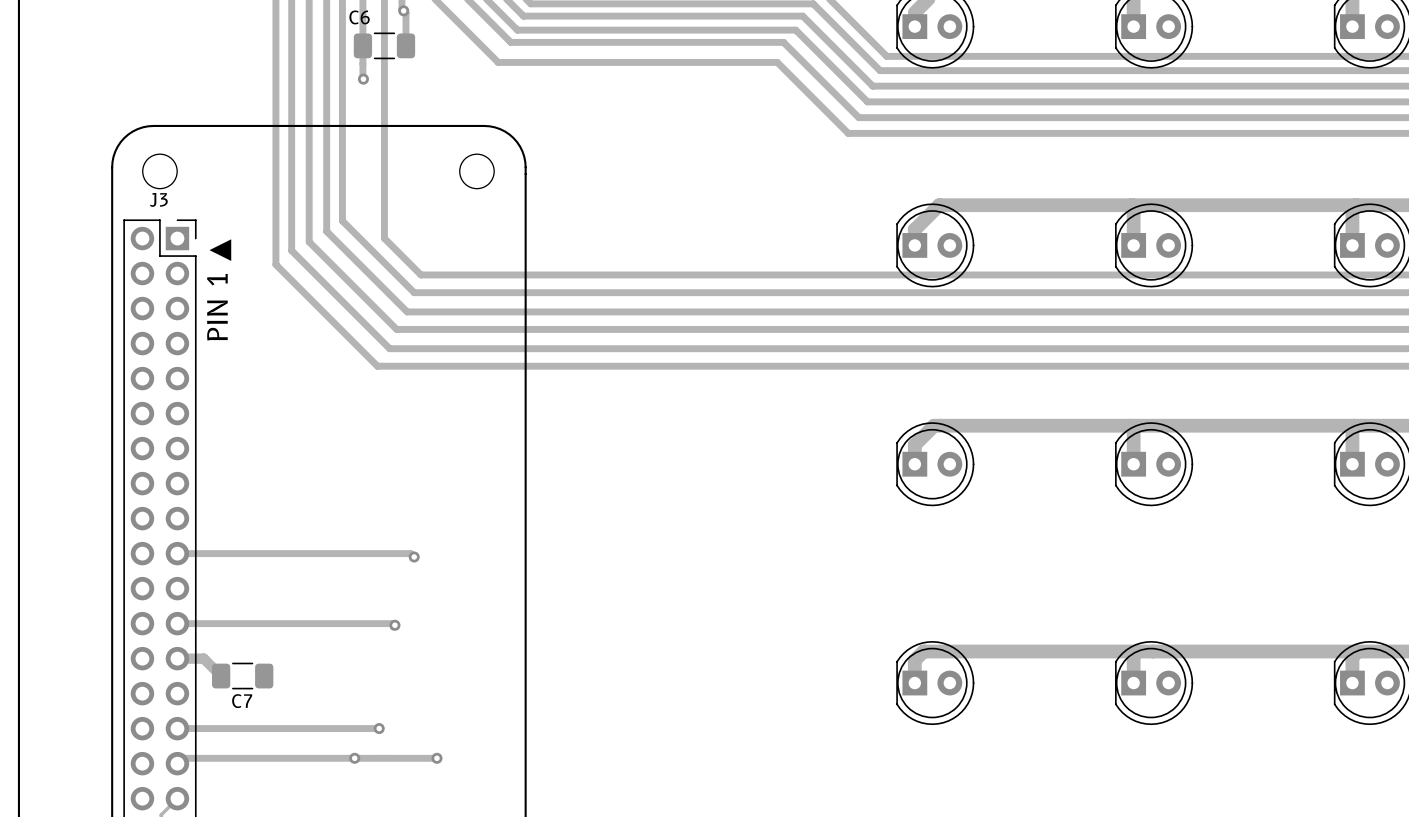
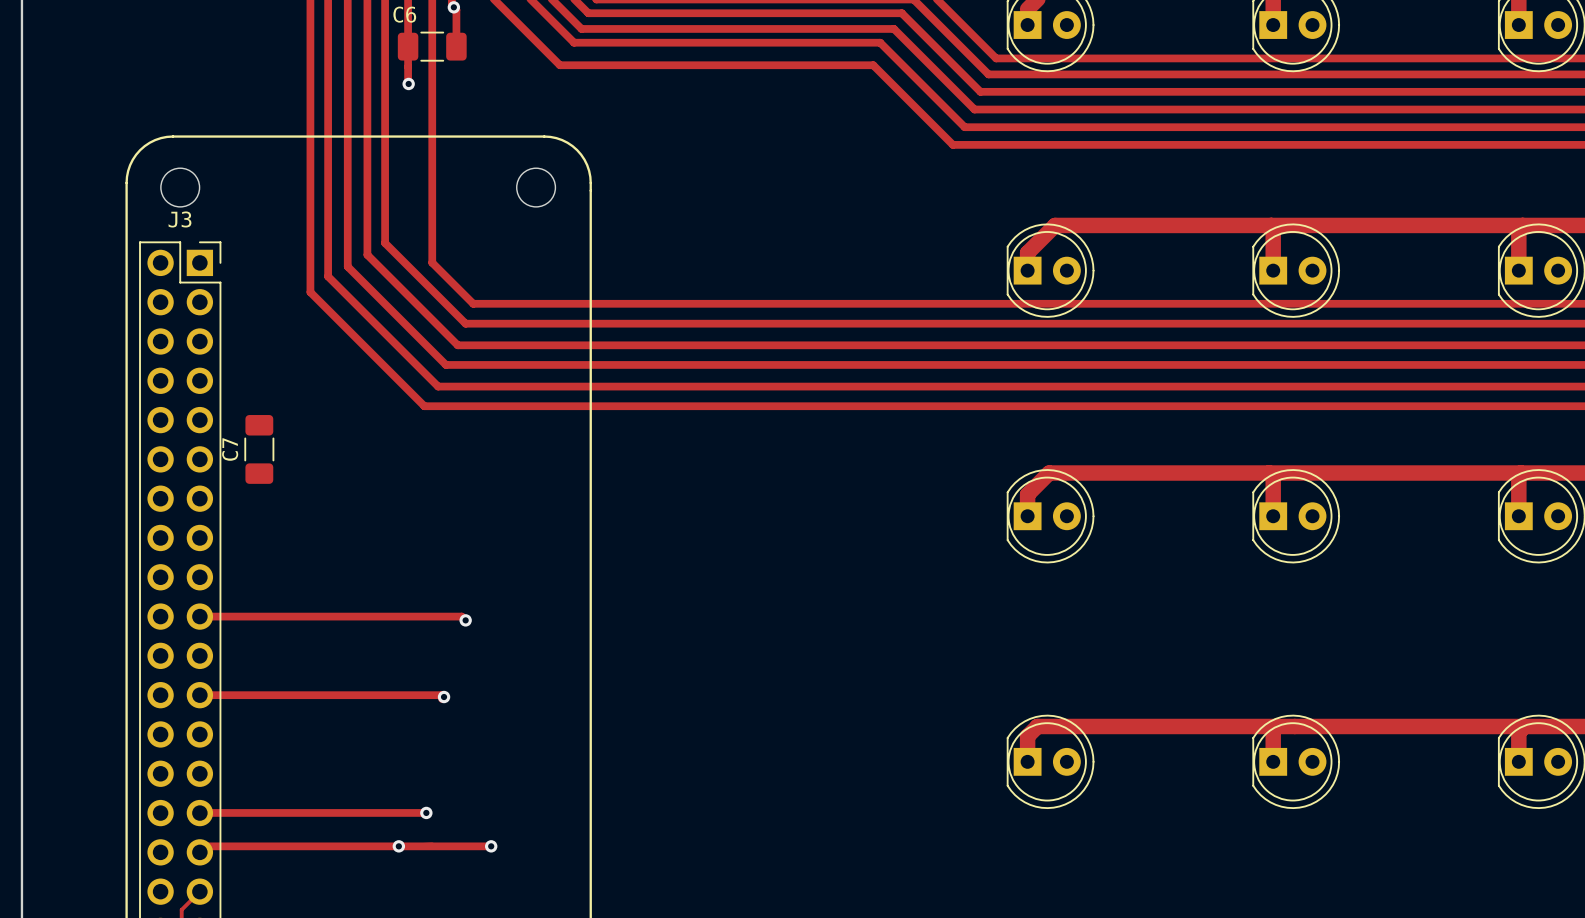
text: PIN 1 ▲ (219, 289) -> none
track: (177, 658) (203, 658) (221, 676) -> none
C7 rotation: 0° (242, 676) -> 90° clockwise (259, 449)
C7 position: (242, 676) -> (259, 449)

